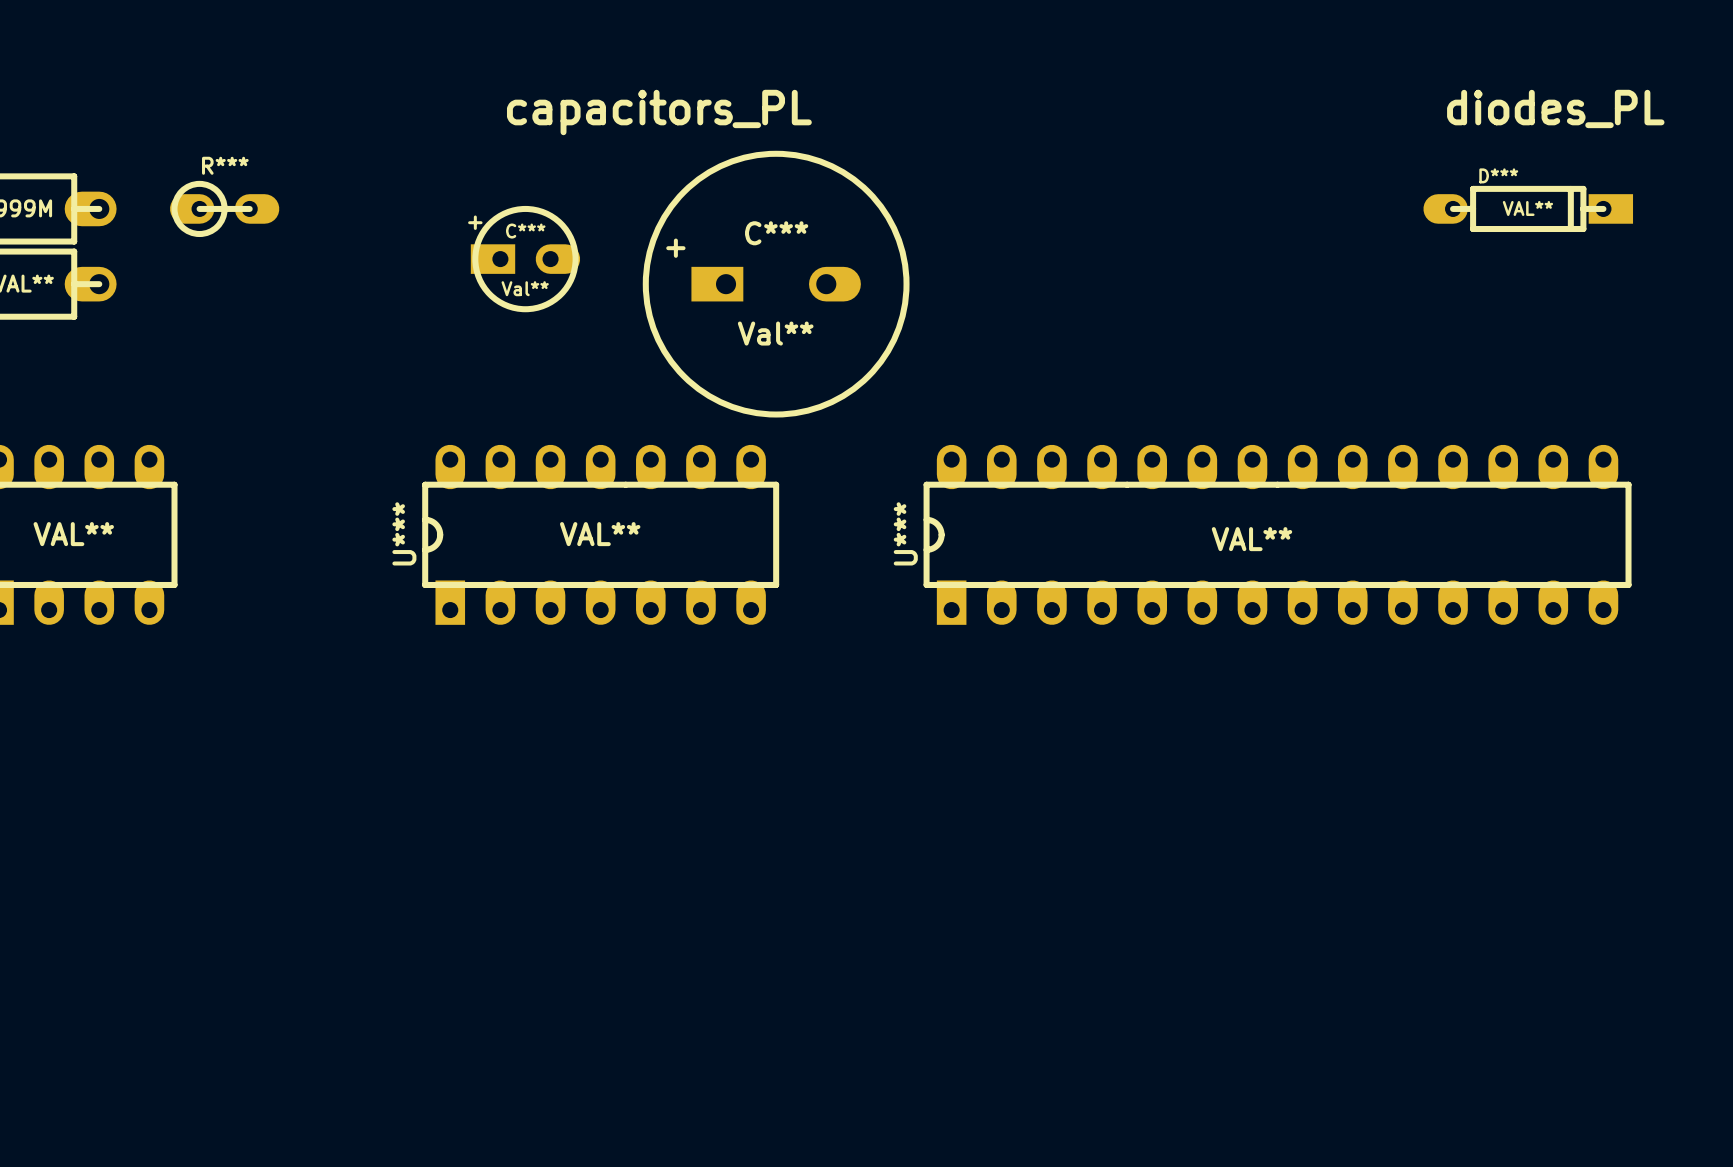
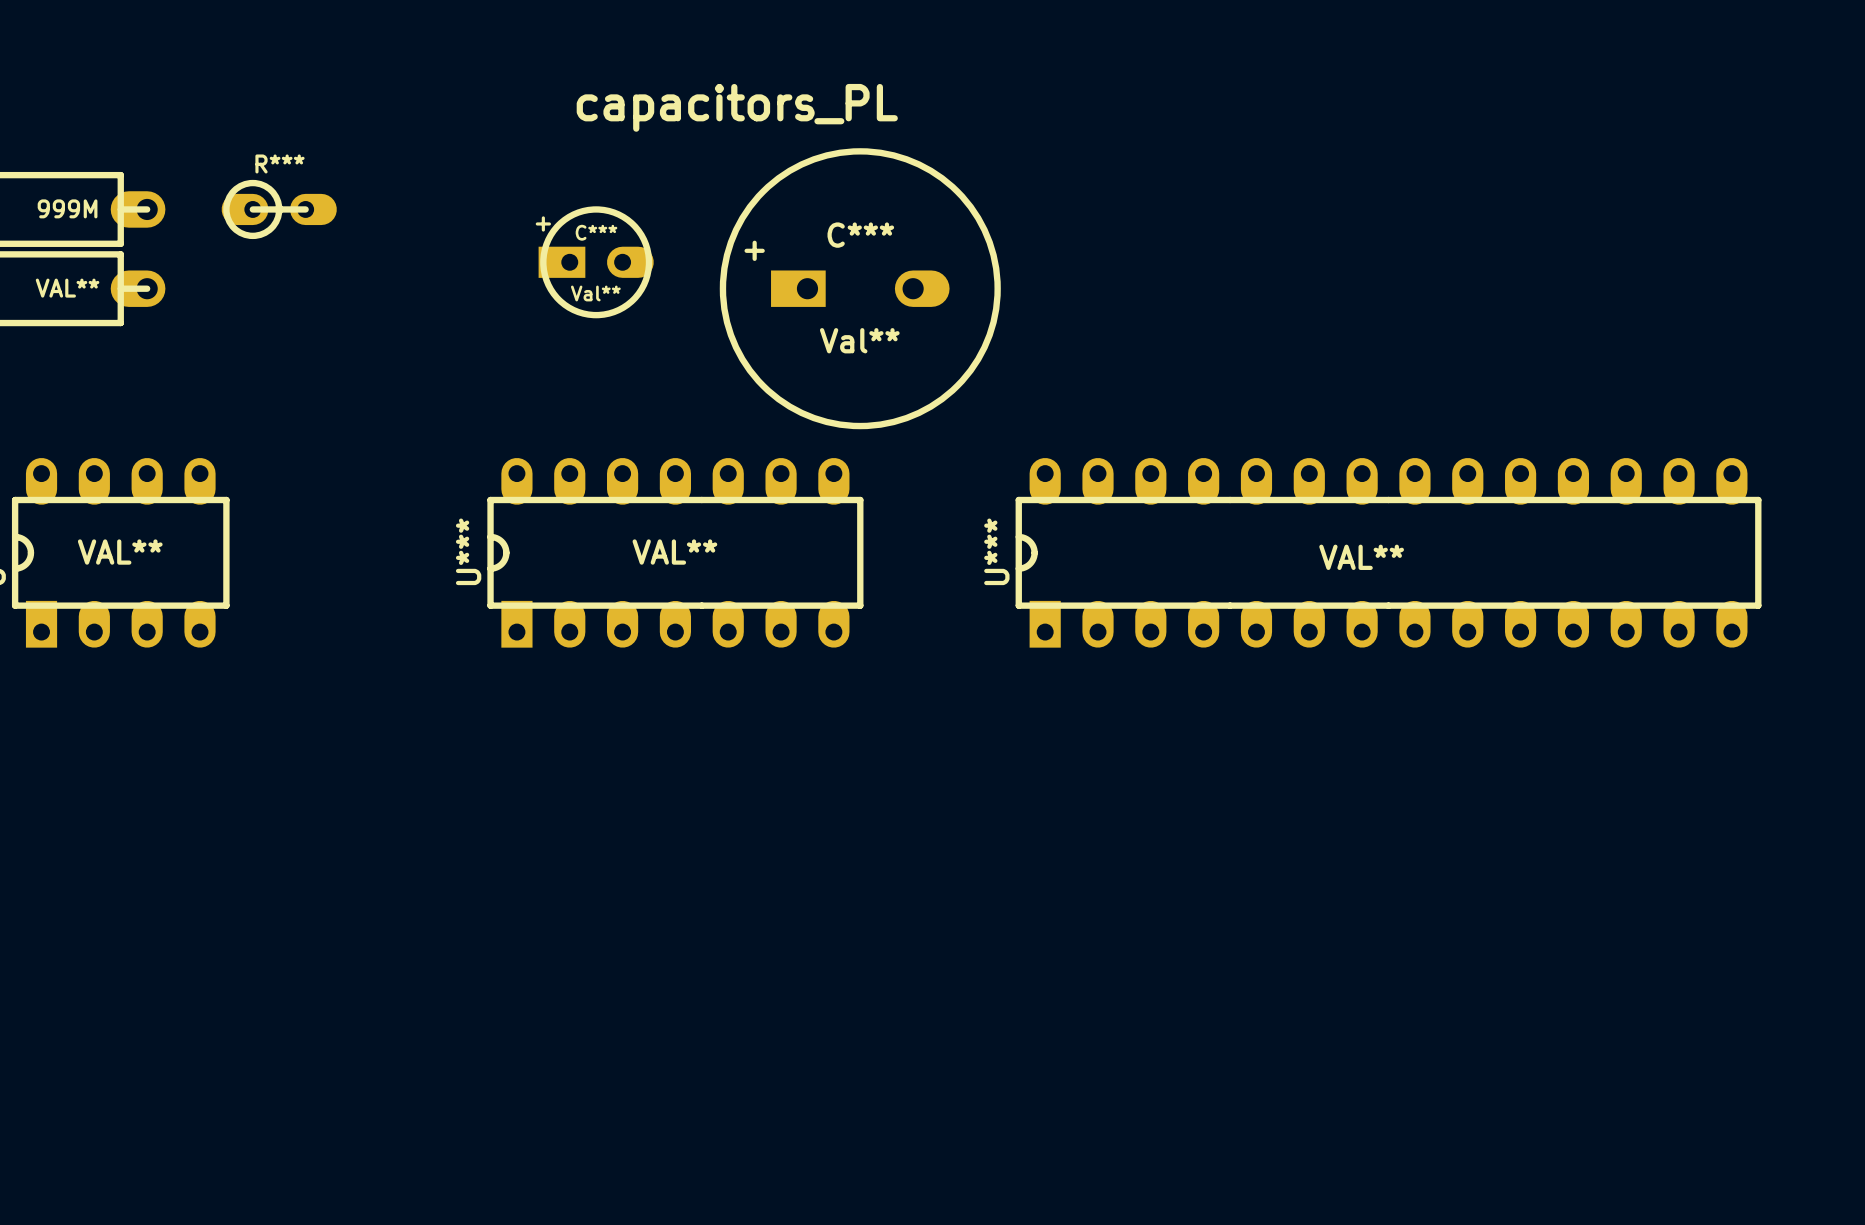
text: diodes_PL (1555, 108) -> none
D***: VAL** (1528, 208) -> none

